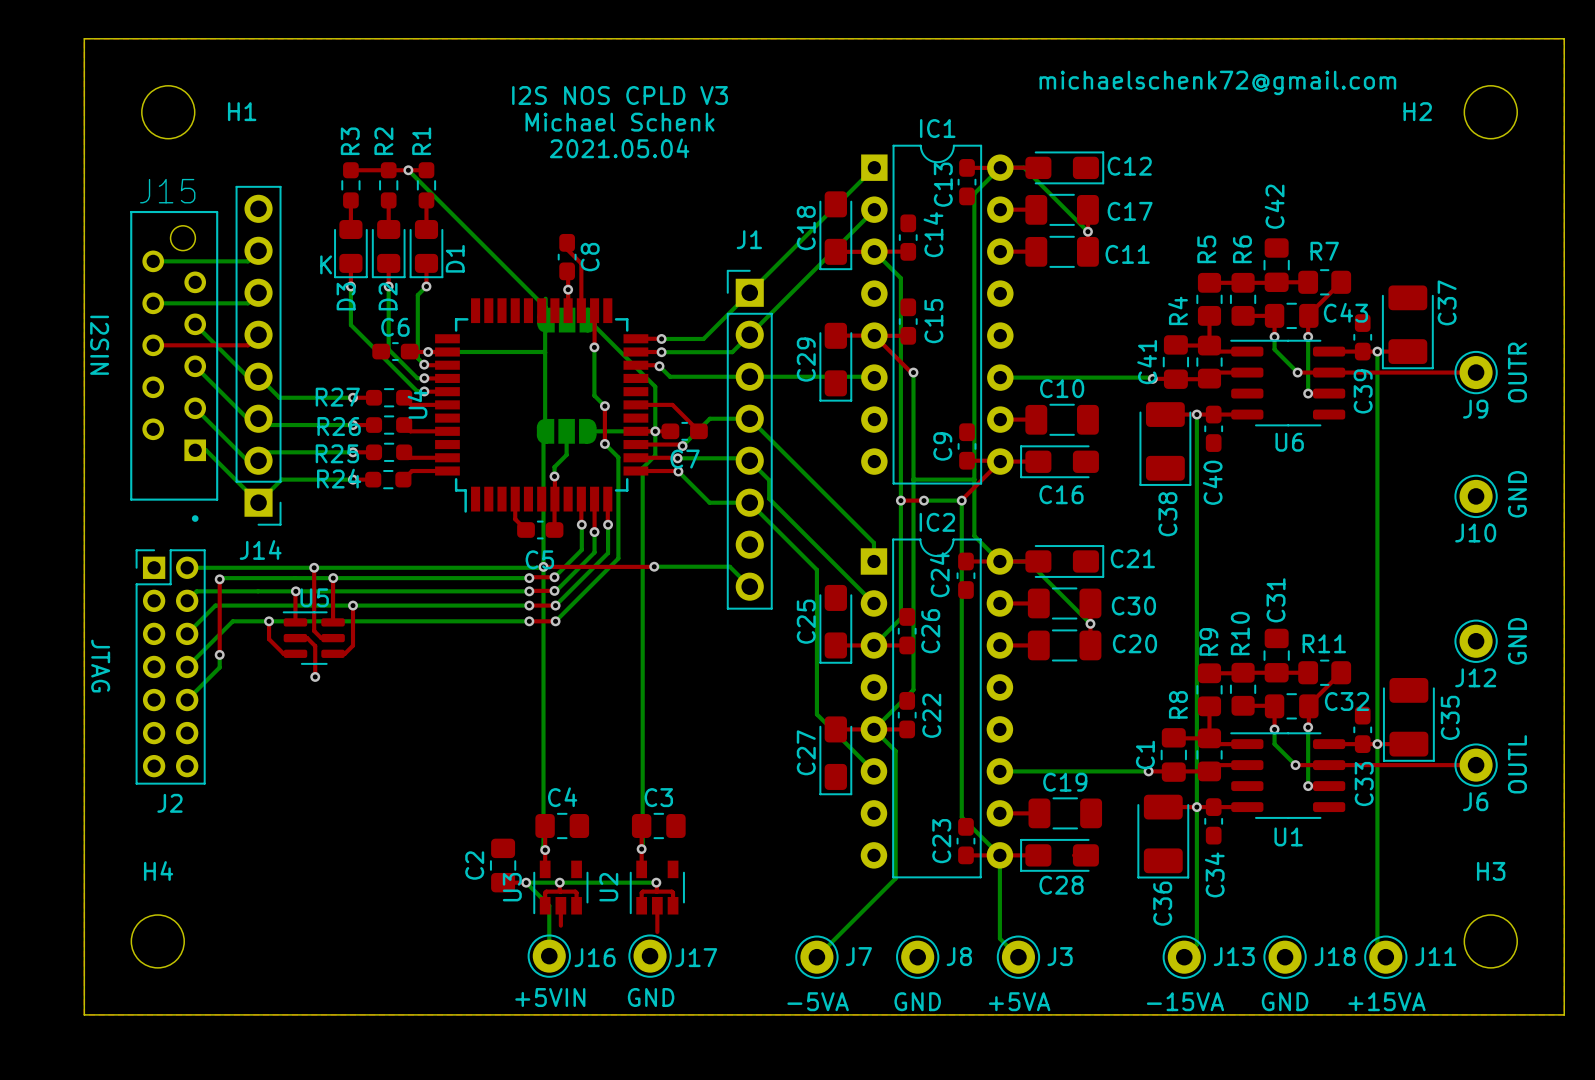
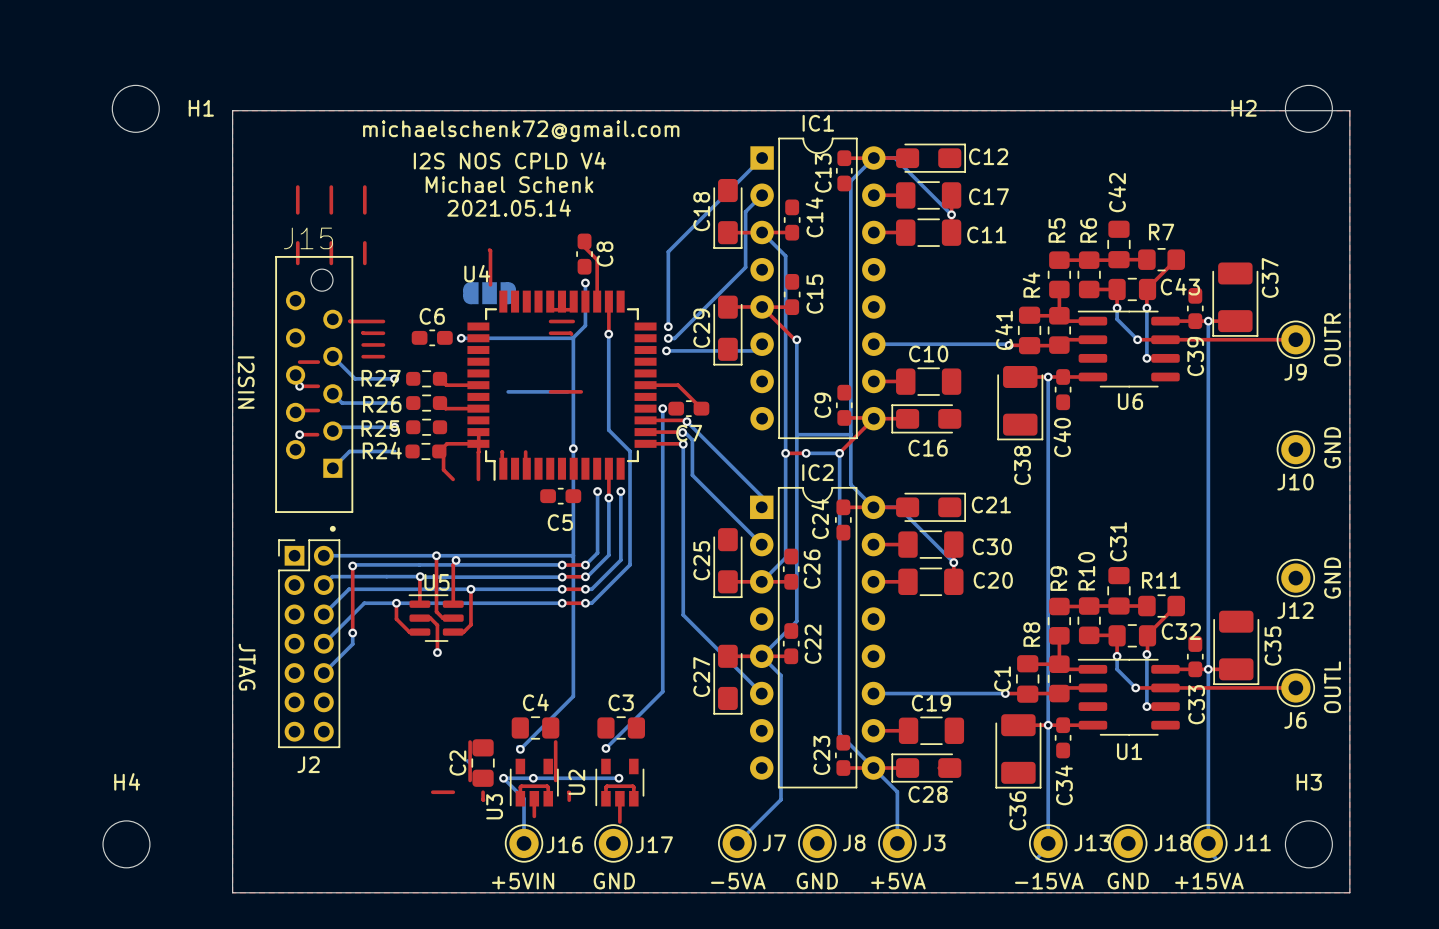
board edge: (84, 38) (84, 1014) (1564, 1014) (1564, 38) (84, 38) -> (232, 110) (232, 892) (1349, 892) (1349, 110) (232, 110)
text: michaelschenk72@gmail.com (1217, 82) -> none
text: I2S NOS CPLD V3 (620, 95) -> none
text position: Michael Schenk (620, 122) -> Michael Schenk (509, 184)
text: none -> michaelschenk72@gmail.com (521, 131)
text: 2021.05.04 (619, 148) -> none
top track: (350, 170) (426, 170) -> none
bottom track: (408, 170) (545, 307) -> none
via: (408, 170) -> none
text: none -> I2S NOS CPLD V4 (509, 160)
R3: (350, 185) -> none
R2: (388, 185) -> none
R1: (426, 185) -> none
bottom track: (874, 210) (732, 352) (661, 352) -> (762, 195) (745, 211) (745, 267) (674, 338) (668, 338)
text: none -> 2021.05.14 (509, 207)
top track: (567, 242) (567, 249) (581, 263) (581, 310) -> (584, 241) (584, 247) (597, 259) (597, 301)
D3: (350, 249) -> none
D2: (388, 249) -> none
D1: (426, 249) -> none
bottom track: (258, 250) (247, 261) (153, 261) -> none
C8 position: (567, 257) -> (584, 254)
text: K (326, 264) -> none
bottom track: (768, 273) (703, 338) (661, 338) -> (668, 251) (668, 326)
bottom track: (350, 286) (350, 324) (417, 391) (424, 391) -> none
via: (350, 286) -> none
bottom track: (388, 286) (388, 349) (417, 378) (424, 378) -> none
via: (388, 286) -> none
bottom track: (426, 286) (417, 295) (417, 358) (424, 364) -> none
via: (426, 286) -> none
via: (568, 289) -> none
bottom track: (258, 292) (247, 303) (153, 303) -> none
bottom track: (545, 298) (545, 431) (543, 432) (543, 848) -> none
bottom track: none -> (585, 282) (585, 325) (572, 338)
via: none -> (585, 282)
top track: (594, 310) (594, 347) -> (608, 301) (608, 334)
bottom track: (588, 320) (655, 386) (655, 455) (642, 468) (641, 849) -> none
bottom track: (195, 324) (247, 376) (258, 376) (279, 397) (353, 397) -> none
top track: (258, 334) (247, 345) (153, 345) -> none
via: (661, 338) -> none
text position: I2SIN (99, 345) -> I2SIN (246, 382)
bottom track: (594, 347) (594, 395) (604, 406) -> none
via: (594, 347) -> none
C6 position: (395, 351) -> (432, 337)
bottom track: (428, 352) (545, 352) -> none
via: (428, 352) -> none
via: (661, 352) -> none
J14: (258, 355) -> none
via: none -> (668, 326)
via: (424, 364) -> none
J15 position: (174, 366) -> (314, 393)
bottom track: (195, 366) (247, 418) (258, 418) (264, 425) (353, 425) -> none
bottom track: (659, 366) (669, 376) (873, 376) -> none
via: (659, 366) -> none
bottom track: none -> (608, 334) (608, 430) (630, 451) (630, 564) (591, 603) (585, 603)
via: none -> (608, 334)
bottom track: none -> (461, 338) (572, 338)
via: none -> (461, 338)
bottom track: none -> (572, 338) (573, 696) (520, 749) (517, 746)
via: none -> (668, 338)
bottom track: none -> (762, 344) (755, 350) (666, 350)
via: (424, 378) -> none
via: none -> (666, 350)
bottom track: none -> (332, 356) (355, 378) (394, 378)
via: (424, 391) -> none
via: (353, 397) -> none
R27 position: (389, 397) -> (426, 378)
top track: (404, 397) (411, 404) (447, 404) -> (439, 378) (446, 385) (478, 385)
U4 name rotation: 0° (417, 404) -> 90° clockwise (477, 273)
U4 name position: U4 (417, 404) -> U4 (477, 273)
top track: (635, 404) (672, 404) (698, 431) -> (645, 385) (678, 385) (701, 408)
U4 position: (541, 405) -> (561, 385)
top track: (604, 406) (604, 443) -> none
via: (604, 406) -> none
bottom track: (195, 408) (247, 460) (258, 460) (266, 452) (353, 452) -> none
via: none -> (394, 378)
R26 position: (389, 425) -> (426, 403)
top track: (404, 425) (410, 431) (447, 431) -> (439, 403) (445, 408) (478, 408)
bottom track: (566, 431) (566, 454) (554, 467) (554, 476) -> none
part: (566, 431) -> none
via: (655, 431) -> none
C7 position: (684, 431) -> (688, 408)
bottom track: none -> (332, 393) (342, 403) (394, 403)
J1: (749, 439) -> none
bottom track: (604, 443) (618, 457) (618, 558) (555, 621) -> none
via: (604, 443) -> none
top track: (635, 444) (682, 446) -> (645, 420) (686, 421)
bottom track: (682, 446) (709, 418) (749, 418) (873, 542) (873, 549) -> (686, 421) (761, 496)
via: (682, 446) -> none
bottom track: (195, 450) (206, 450) (258, 502) -> none
bottom track: none -> (662, 408) (662, 691) (605, 748)
via: none -> (662, 408)
via: (353, 452) -> none
R25 position: (389, 452) -> (426, 427)
top track: (404, 452) (409, 457) (447, 457) -> none
top track: (635, 457) (677, 458) -> (645, 432) (682, 432)
bottom track: (677, 458) (747, 458) (769, 480) (769, 498) (795, 525) -> (682, 432) (692, 439) (692, 475)
via: (677, 458) -> none
via: none -> (686, 421)
top track: (447, 471) (412, 471) (403, 479) -> (478, 443) (446, 443) (439, 451)
bottom track: none -> (394, 427) (336, 427) (332, 431)
via: none -> (394, 427)
top track: (635, 471) (678, 471) -> (645, 443) (683, 444)
bottom track: (678, 471) (709, 502) (749, 502) (816, 569) (816, 714) -> (683, 444) (683, 615) (711, 642)
via: (678, 471) -> none
via: (554, 476) -> none
via: none -> (682, 432)
bottom track: (353, 479) (281, 479) (258, 502) -> none
R24 position: (388, 479) -> (425, 451)
via: none -> (683, 444)
via: none -> (573, 448)
bottom track: none -> (394, 451) (349, 451) (332, 468)
top track: (594, 499) (594, 532) -> (608, 468) (608, 497)
bottom track: (581, 524) (581, 549) (554, 577) -> none
via: (581, 524) -> none
bottom track: (608, 524) (608, 553) (555, 605) -> none
via: (608, 524) -> none
C5 position: (540, 530) -> (560, 496)
bottom track: (594, 532) (594, 552) (554, 590) -> none
via: (594, 532) -> none
bottom track: none -> (597, 491) (597, 552) (585, 565)
via: none -> (597, 491)
bottom track: none -> (620, 491) (620, 560) (591, 589) (585, 589)
via: none -> (620, 491)
bottom track: none -> (608, 497) (608, 555) (585, 576)
via: none -> (608, 497)
top track: (543, 566) (654, 566) -> none
via: (543, 566) -> none
bottom track: (654, 566) (729, 566) (749, 586) -> none
via: (654, 566) -> none
bottom track: (187, 567) (541, 567) (543, 569) -> none
top track: (314, 567) (314, 630) (321, 638) (333, 638) -> (436, 555) (436, 611) (442, 618) (453, 618)
via: (314, 567) -> none
top track: (554, 577) (529, 578) -> none
via: (554, 577) -> none
top track: (333, 578) (333, 622) -> (453, 565) (453, 604)
via: (333, 578) -> none
bottom track: (529, 578) (219, 579) -> none
via: (529, 578) -> none
top track: (219, 579) (219, 654) -> (352, 565) (352, 633)
via: (219, 579) -> none
top track: (554, 590) (529, 591) -> none
via: (554, 590) -> none
top track: (295, 591) (295, 622) -> (420, 576) (419, 604)
via: (295, 591) -> none
bottom track: (529, 591) (196, 591) (187, 600) -> none
via: (529, 591) -> none
top track: (353, 605) (353, 645) (344, 653) (333, 653) -> (470, 589) (470, 624) (463, 632) (453, 632)
via: (353, 605) -> none
top track: (529, 605) (555, 605) -> (562, 589) (585, 589)
bottom track: (529, 605) (215, 605) (188, 634) -> none
via: (529, 605) -> none
via: (555, 605) -> none
bottom track: none -> (323, 555) (573, 555)
via: none -> (436, 555)
top track: (269, 621) (269, 639) (283, 653) (295, 653) -> (396, 603) (396, 619) (409, 632) (419, 632)
via: (269, 621) -> none
top track: (529, 621) (555, 621) -> (562, 603) (585, 603)
bottom track: (529, 621) (232, 621) (187, 666) -> none
via: (555, 621) -> none
top track: none -> (562, 565) (585, 565)
bottom track: none -> (562, 564) (352, 565)
via: none -> (562, 565)
via: none -> (585, 565)
via: none -> (352, 565)
top track: (295, 638) (307, 638) (315, 646) (315, 676) -> (419, 618) (430, 618) (437, 625) (437, 652)
U5 position: (313, 638) -> (436, 618)
via: none -> (420, 576)
top track: none -> (585, 576) (562, 577)
via: none -> (585, 576)
bottom track: none -> (562, 577) (332, 576) (323, 585)
via: none -> (562, 577)
via: none -> (470, 589)
bottom track: none -> (562, 589) (348, 589) (324, 615)
via: none -> (562, 589)
via: none -> (585, 589)
bottom track: (219, 654) (219, 667) (187, 700) -> (352, 633) (352, 644) (323, 673)
via: (219, 654) -> none
text position: JTAG (100, 666) -> JTAG (247, 667)
J2 position: (170, 666) -> (309, 643)
via: none -> (396, 603)
bottom track: none -> (562, 603) (364, 603) (323, 643)
via: none -> (562, 603)
via: none -> (585, 603)
via: (315, 676) -> none
via: none -> (352, 633)
via: none -> (437, 652)
C4 position: (562, 825) -> (535, 727)
C3 position: (658, 825) -> (621, 727)
via: none -> (605, 748)
via: none -> (520, 749)
via: (641, 849) -> none
via: (545, 850) -> none
bottom track: (999, 855) (999, 938) (1018, 957) -> (873, 768) (897, 791) (897, 843)
C2 position: (503, 865) -> (483, 763)
via: none -> (503, 778)
via: none -> (533, 778)
via: none -> (618, 778)
bottom track: (895, 878) (816, 957) -> (780, 788) (780, 799) (737, 843)
via: (526, 882) -> none
via: (559, 882) -> none
bottom track: (656, 882) (526, 882) (549, 905) (549, 956) -> (618, 778) (503, 778) (524, 798) (524, 843)
via: (656, 882) -> none
U3 name position: U3 (512, 887) -> U3 (494, 806)
U3 position: (560, 887) -> (534, 782)
U2 position: (657, 887) -> (619, 782)
top track: (545, 905) (546, 891) (575, 891) (576, 905) -> (520, 798) (521, 786) (547, 786) (548, 798)
top track: (560, 905) (560, 925) -> (534, 798) (534, 816)
top track: (641, 905) (642, 891) (671, 891) (673, 905) -> (605, 798) (607, 786) (632, 786) (633, 798)
top track: (657, 905) (657, 931) -> (619, 798) (619, 821)
J16 position: (549, 956) -> (524, 843)
J17 position: (650, 956) -> (613, 843)
J7 position: (816, 957) -> (737, 843)
J8 position: (917, 957) -> (817, 843)
J3 position: (1018, 957) -> (897, 843)
J13 position: (1184, 957) -> (1048, 843)
J18 position: (1285, 957) -> (1128, 843)
J11 position: (1385, 957) -> (1208, 843)
text position: +5VIN (550, 997) -> +5VIN (523, 881)
text position: GND (651, 997) -> GND (614, 881)
text position: -5VA (818, 1001) -> -5VA (738, 881)
text position: GND (917, 1001) -> GND (817, 881)
text position: +5VA (1019, 1001) -> +5VA (898, 881)
text position: -15VA (1185, 1001) -> -15VA (1049, 881)
text position: GND (1285, 1001) -> GND (1128, 881)
text position: +15VA (1387, 1001) -> +15VA (1209, 881)

